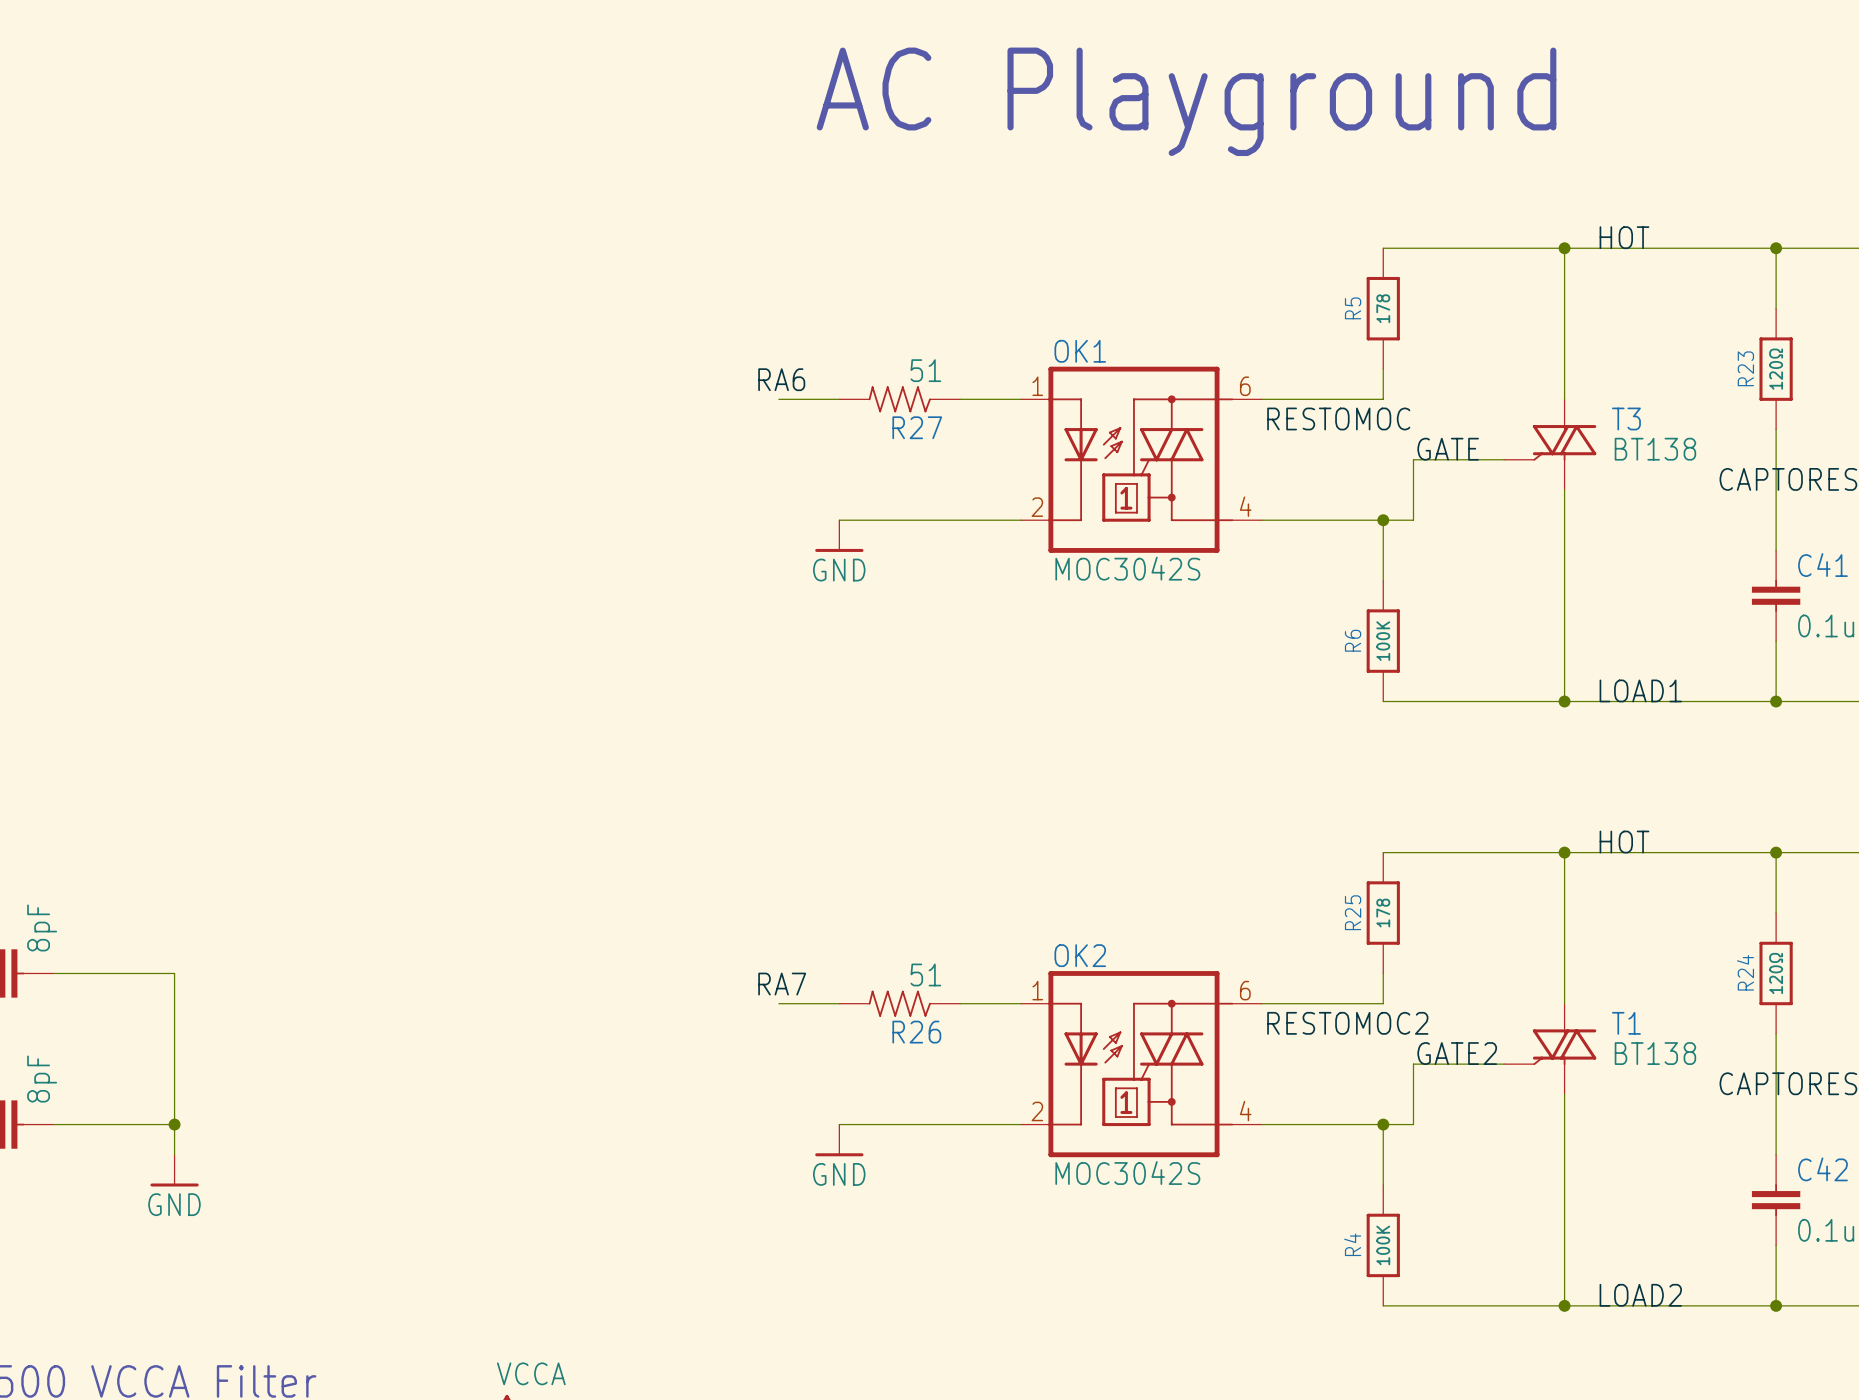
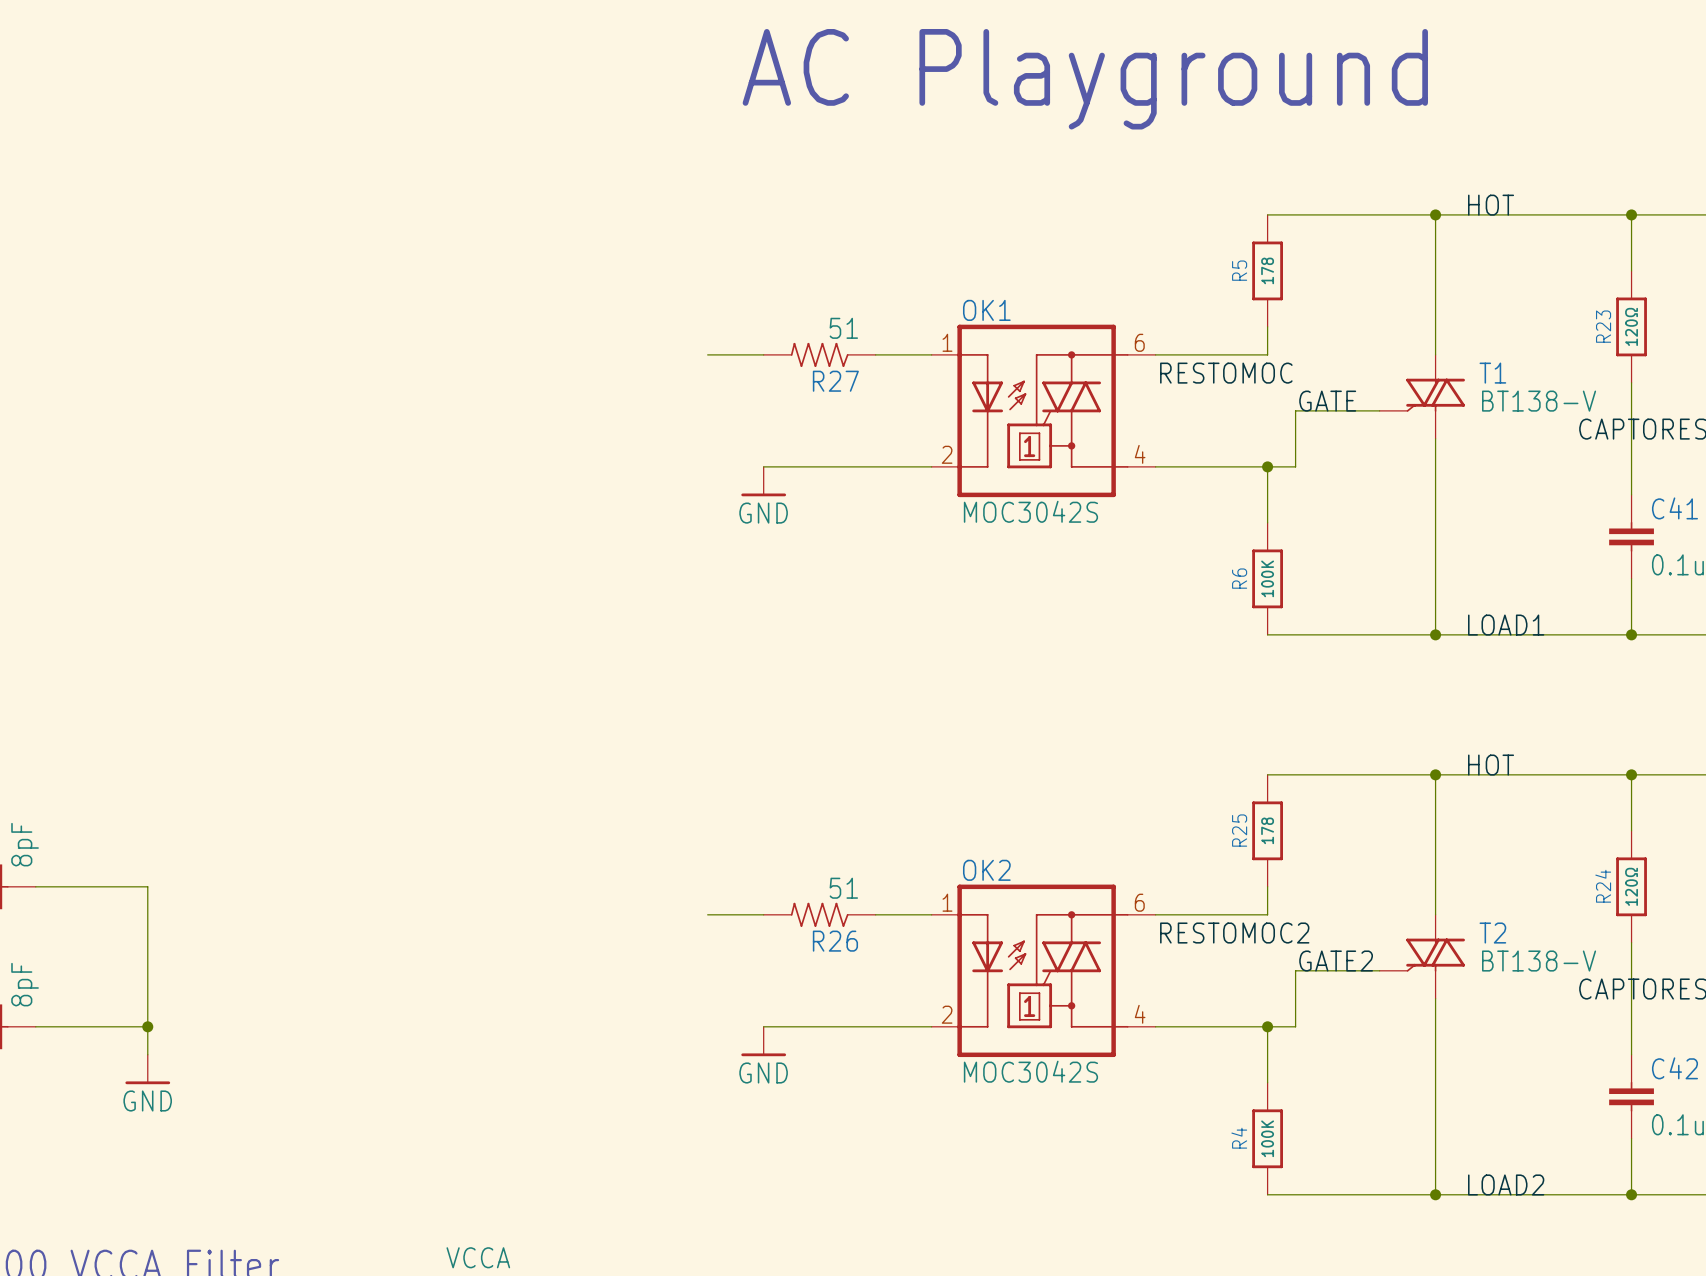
label: RA6 (781, 379) -> none
T3 name: T3 (1626, 418) -> T1 (1492, 373)
T3 value: BT138 (1655, 449) -> BT138-V (1539, 401)
label: RA7 (782, 984) -> none
T1 name: T1 (1626, 1023) -> T2 (1492, 933)
T1 value: BT138 (1655, 1053) -> BT138-V (1539, 961)

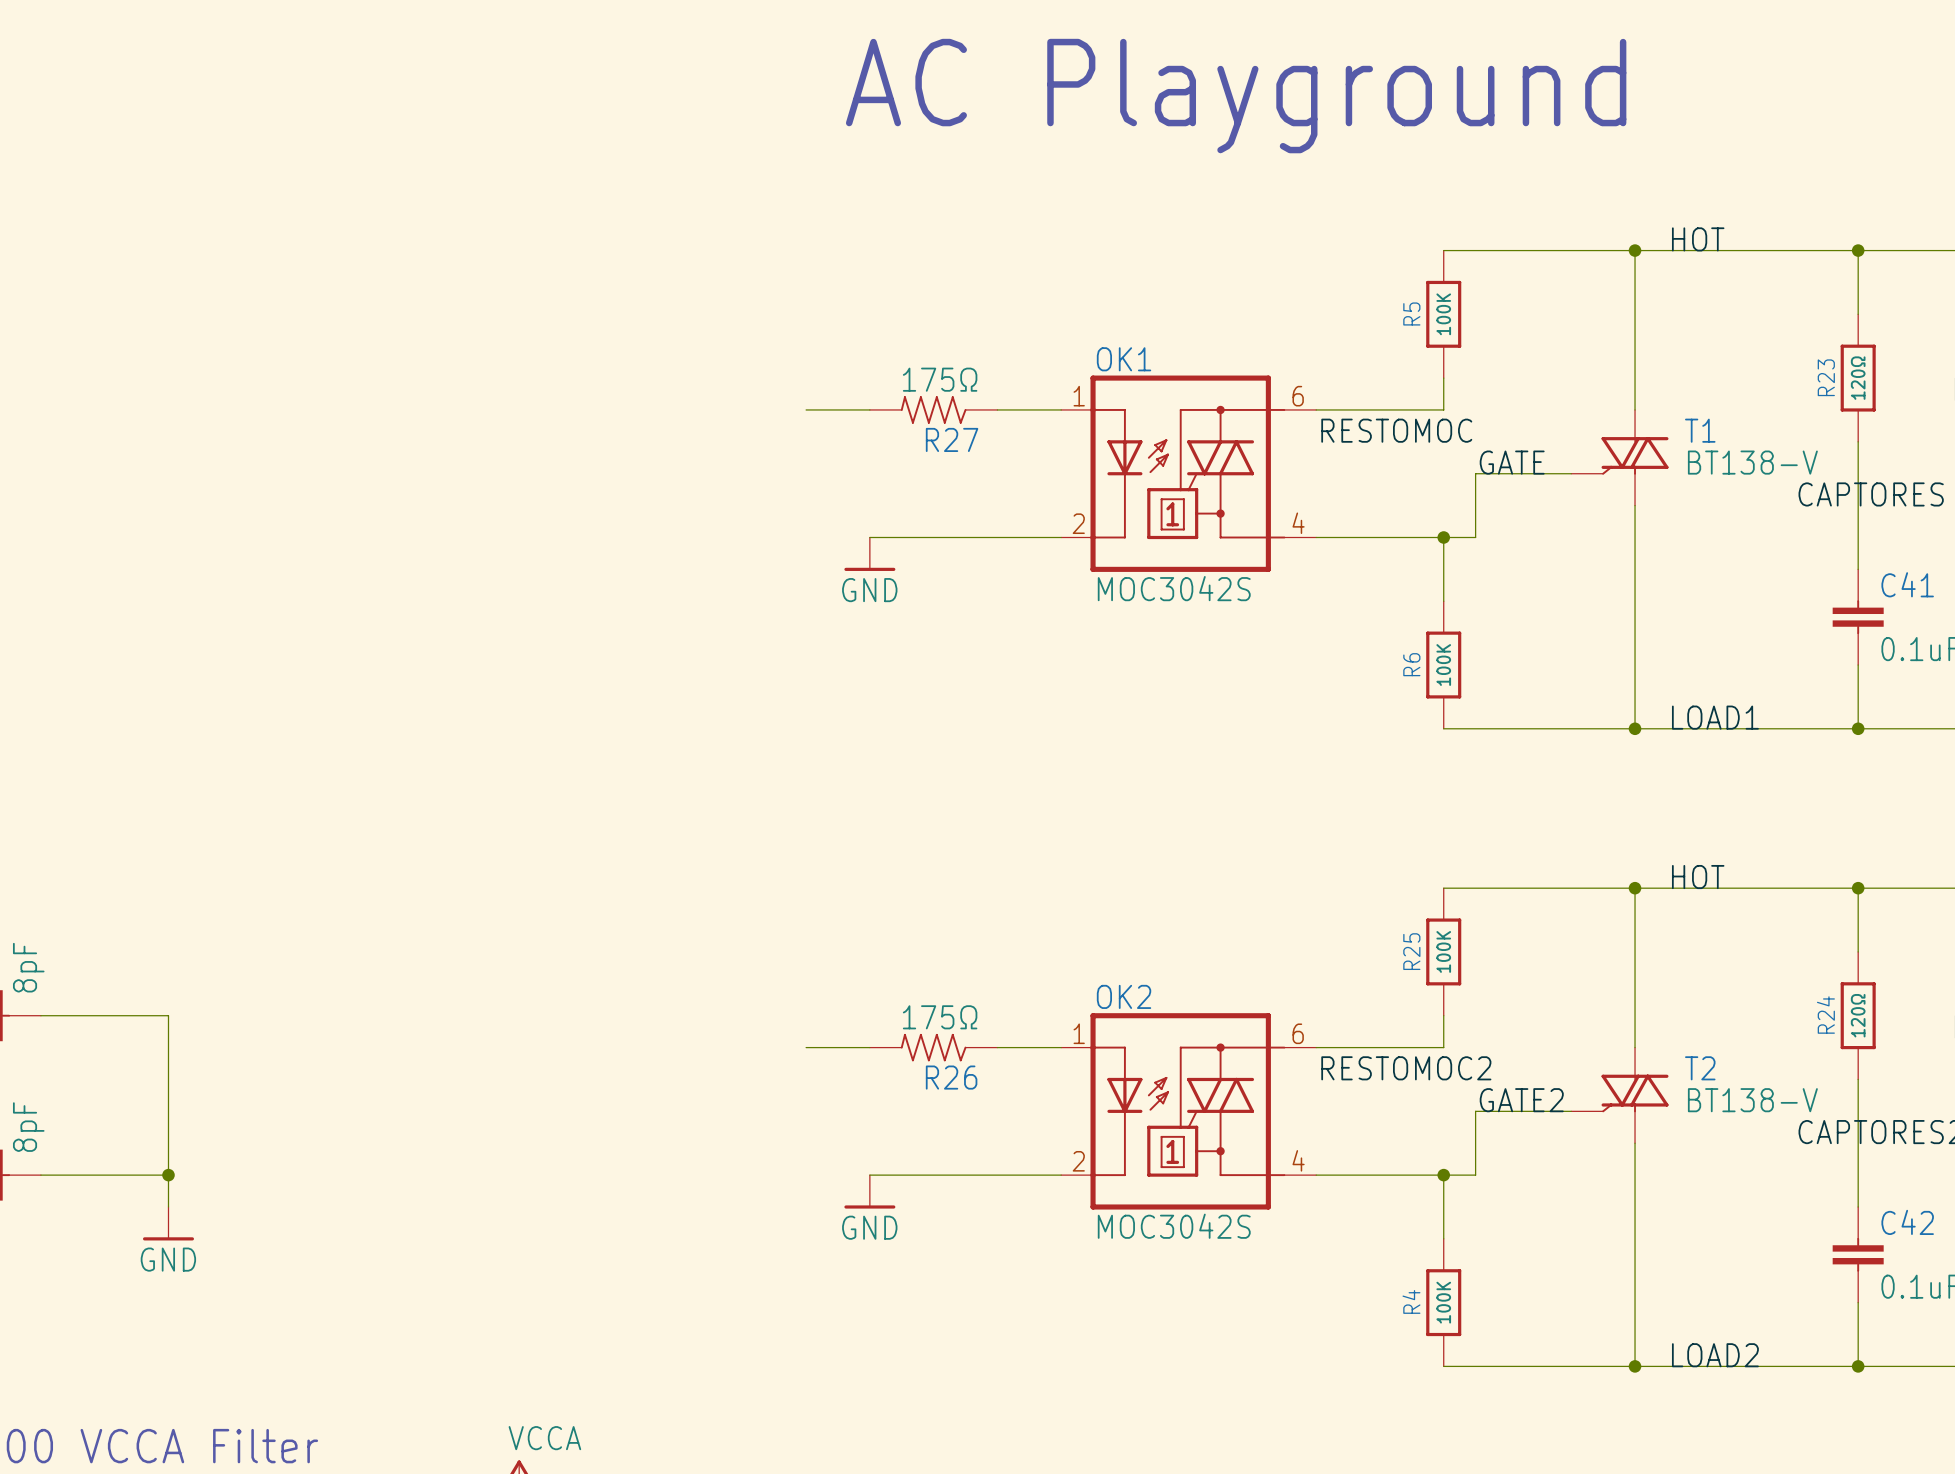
R5 value: 178 (1267, 270) -> 100K (1443, 314)
R27 value: 51 (843, 328) -> 175Ω (940, 379)
R25 value: 178 (1267, 830) -> 100K (1443, 951)
R26 value: 51 (843, 888) -> 175Ω (940, 1017)

